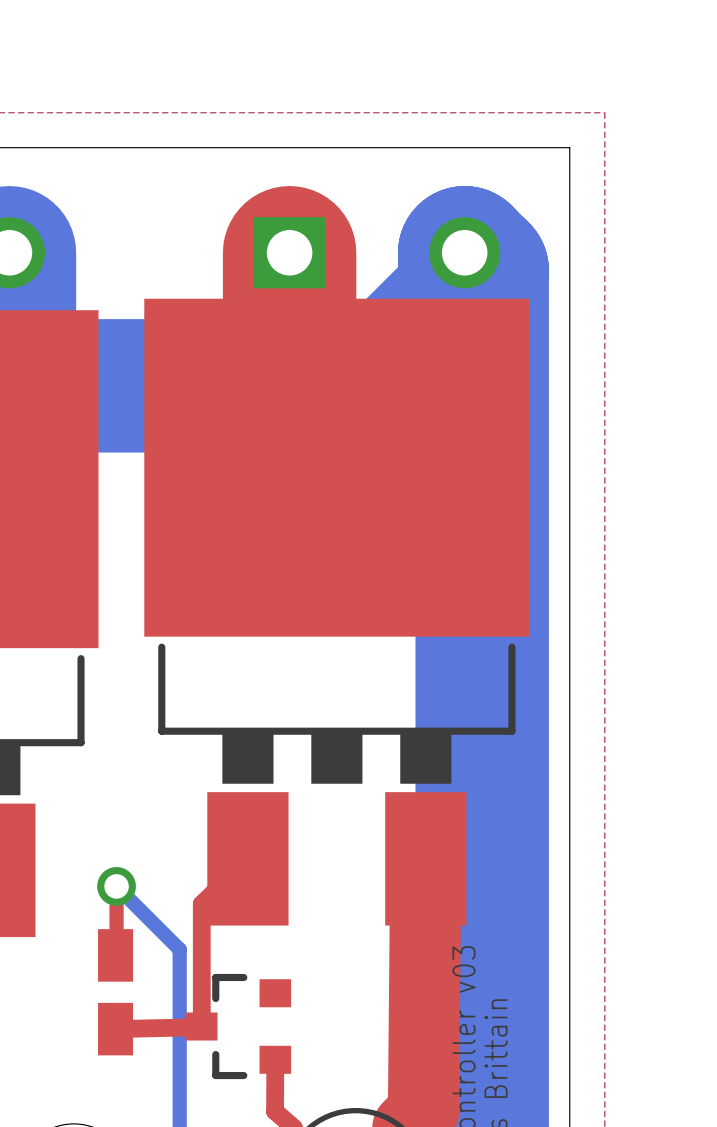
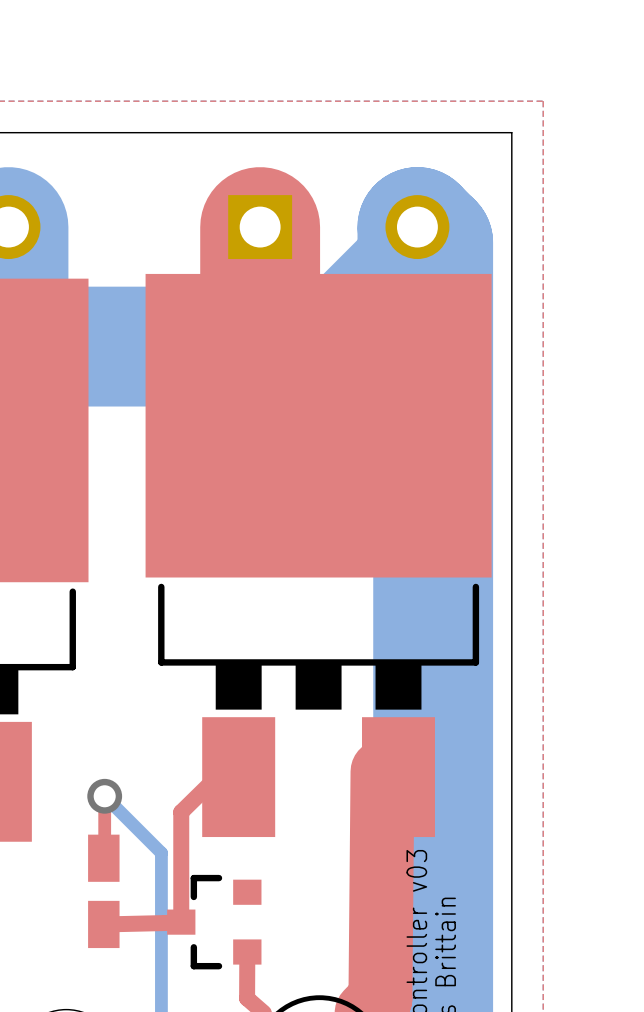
part position: (336, 612) -> (318, 555)

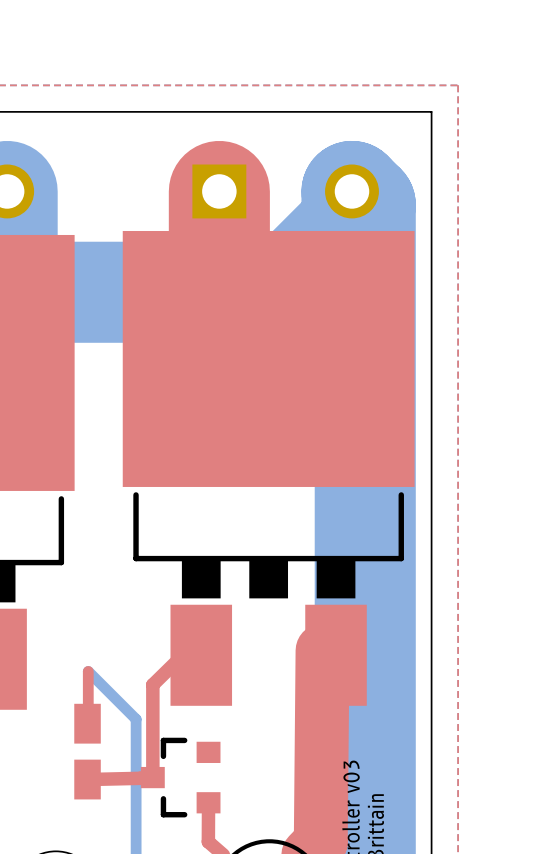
via: (104, 796) -> none

